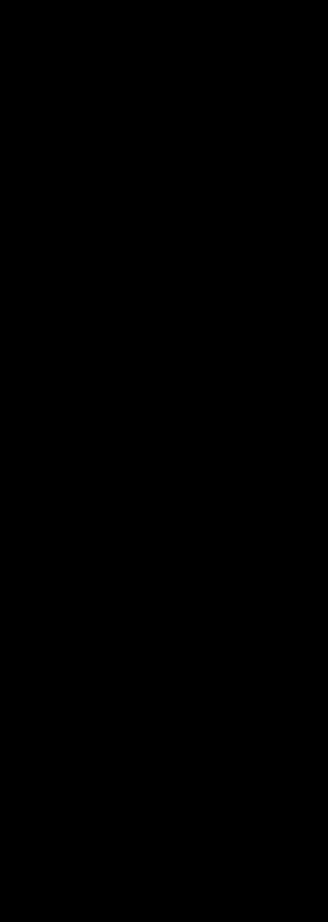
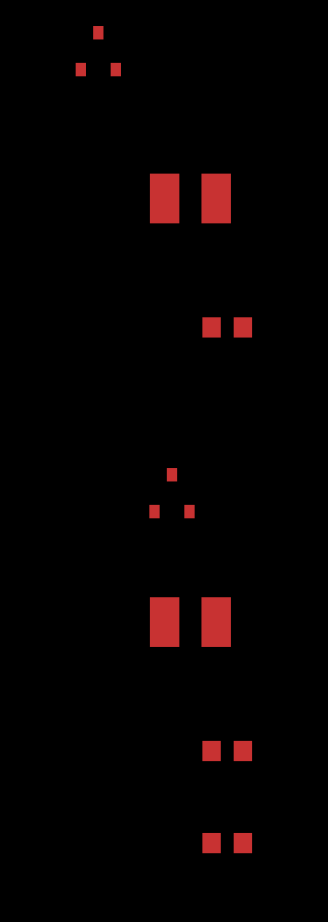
part: none -> (98, 51)
part: none -> (190, 198)
part: none -> (227, 327)
part: none -> (171, 493)
part: none -> (190, 622)
part: none -> (227, 751)
part: none -> (227, 843)

